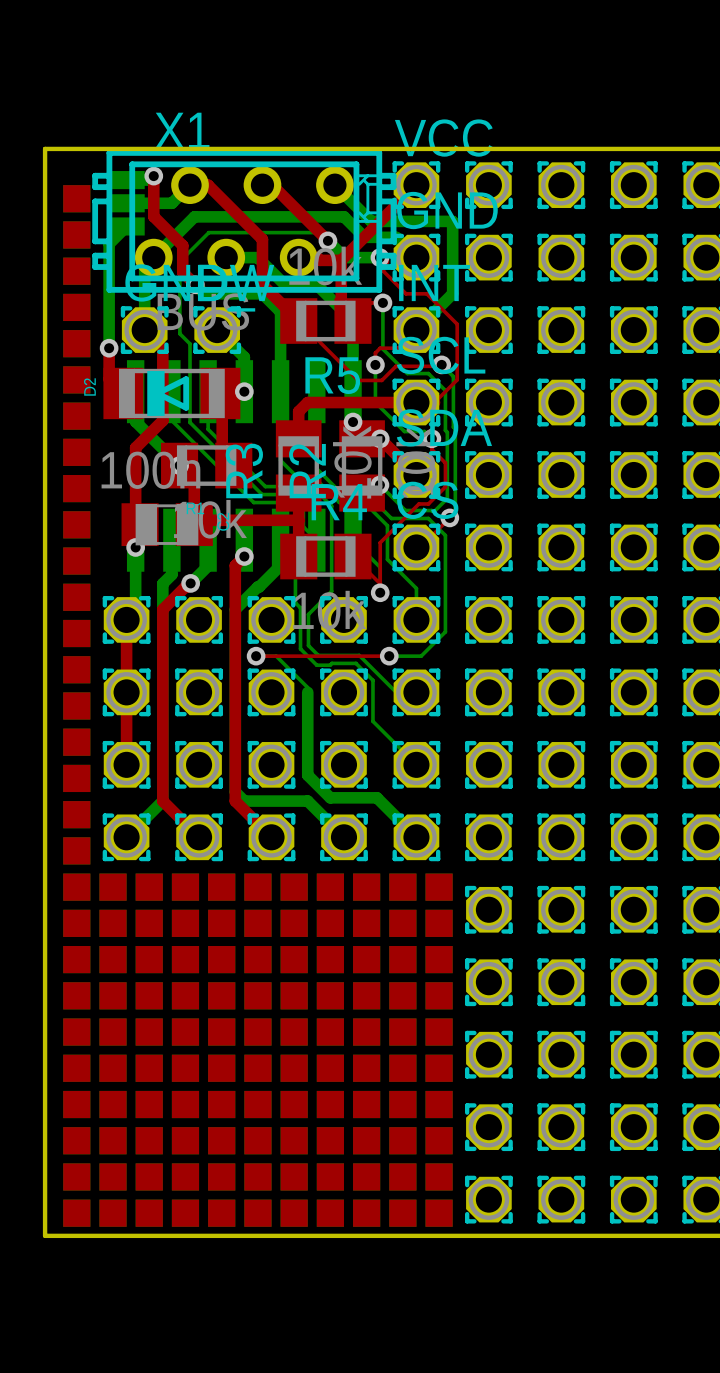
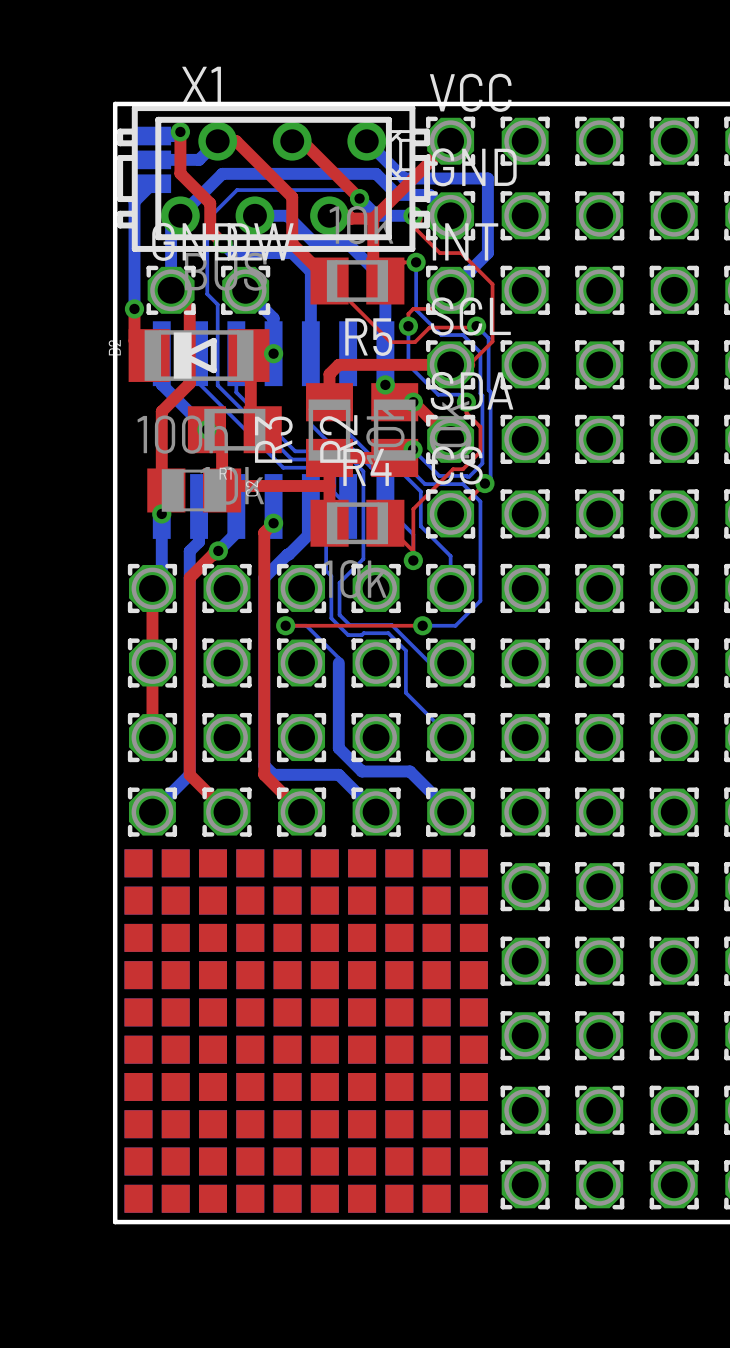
board edge: (90, 148) (45, 148) (45, 1235) (90, 1235) -> (115, 103) (115, 1222)
drawing: [63, 185, 91, 1227] -> none

